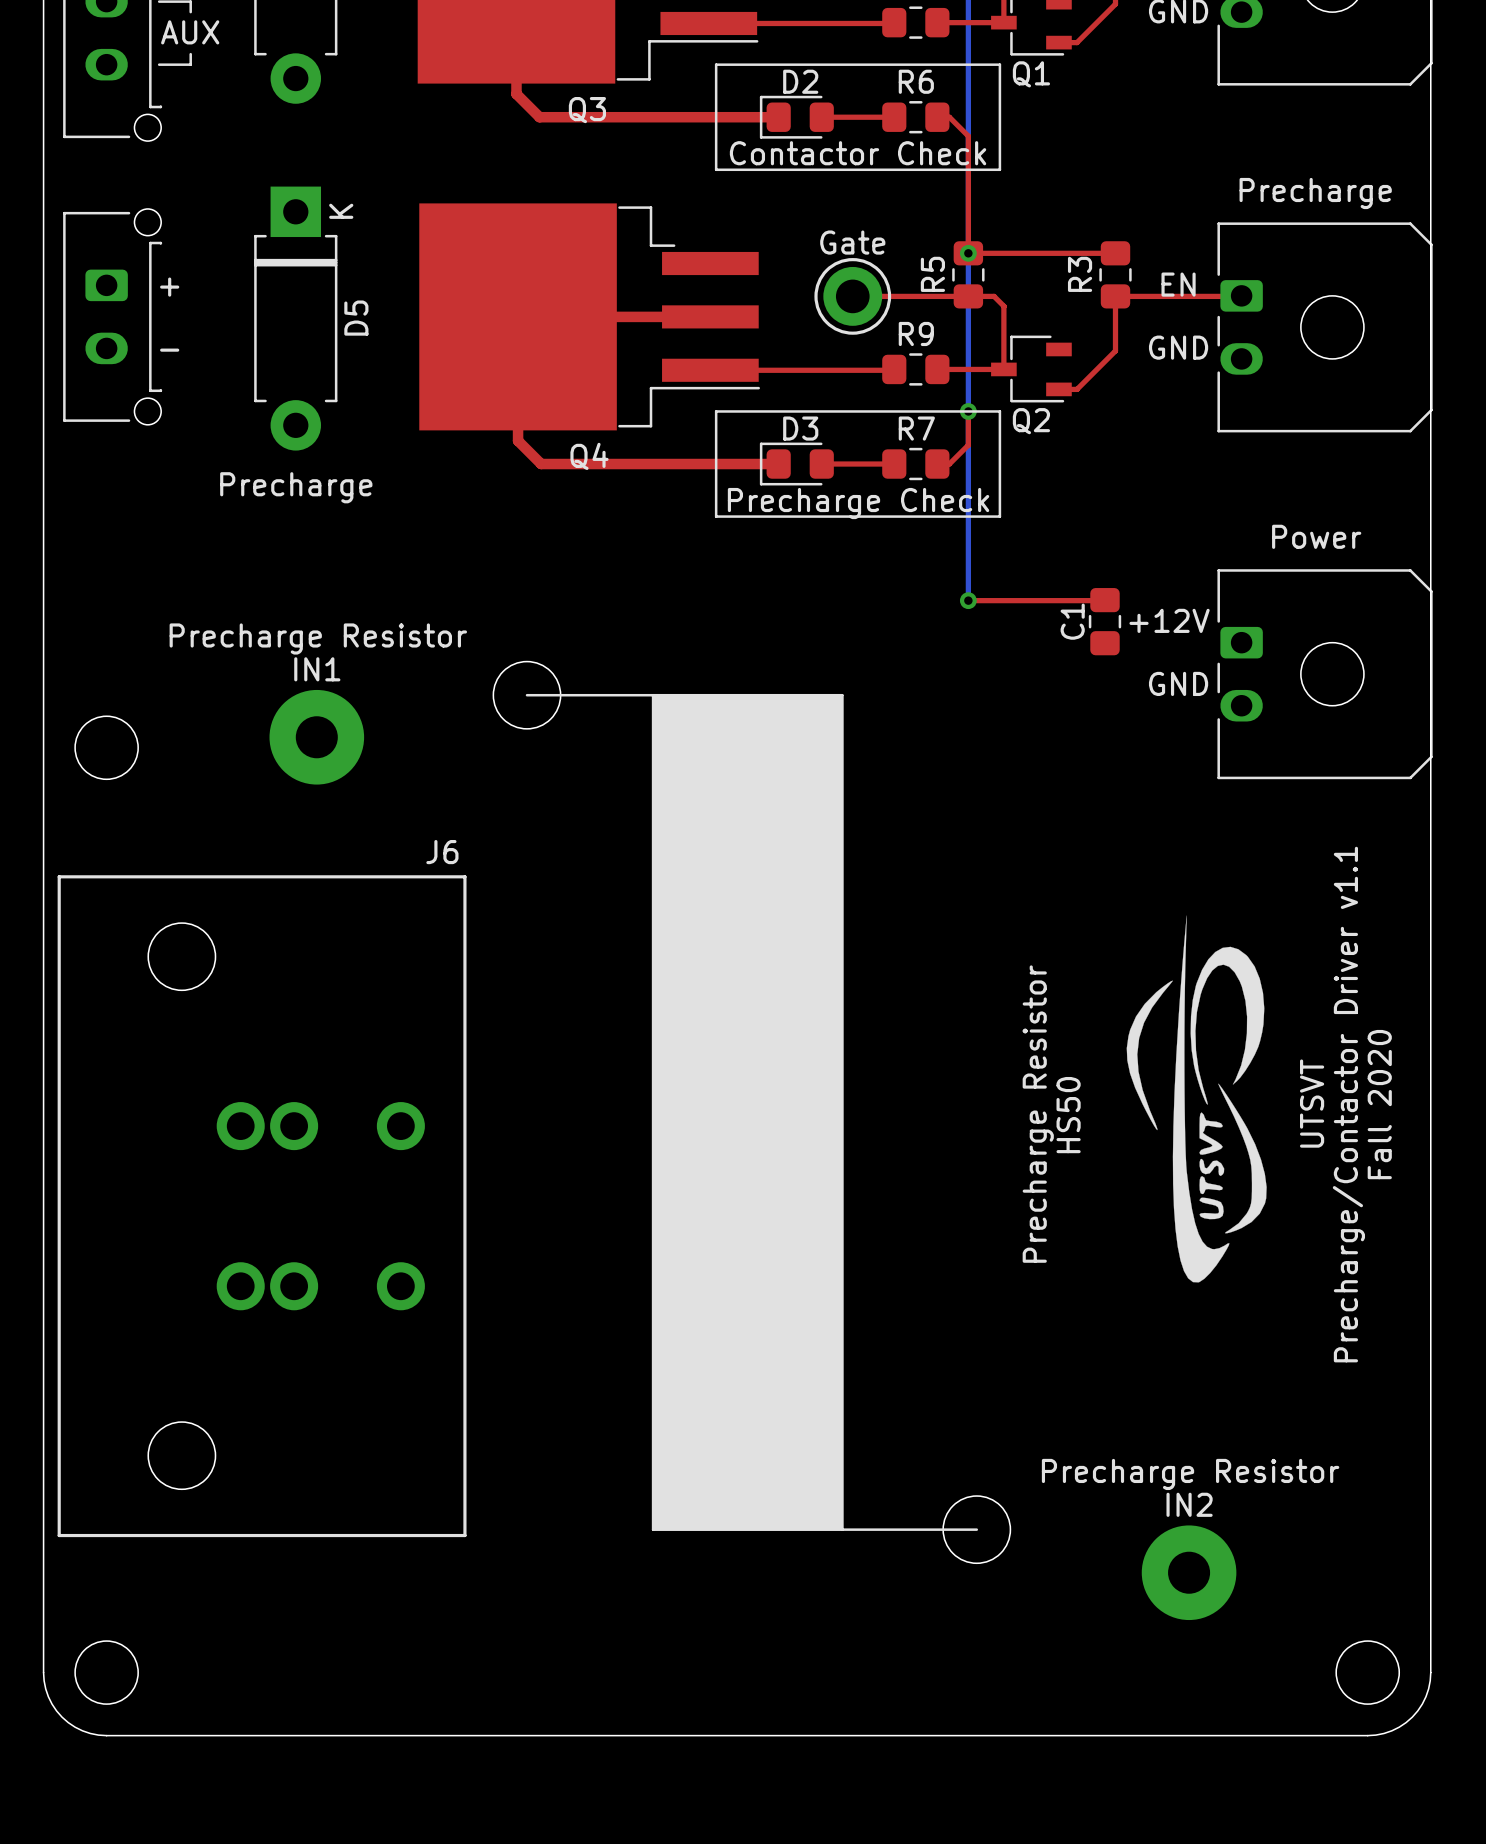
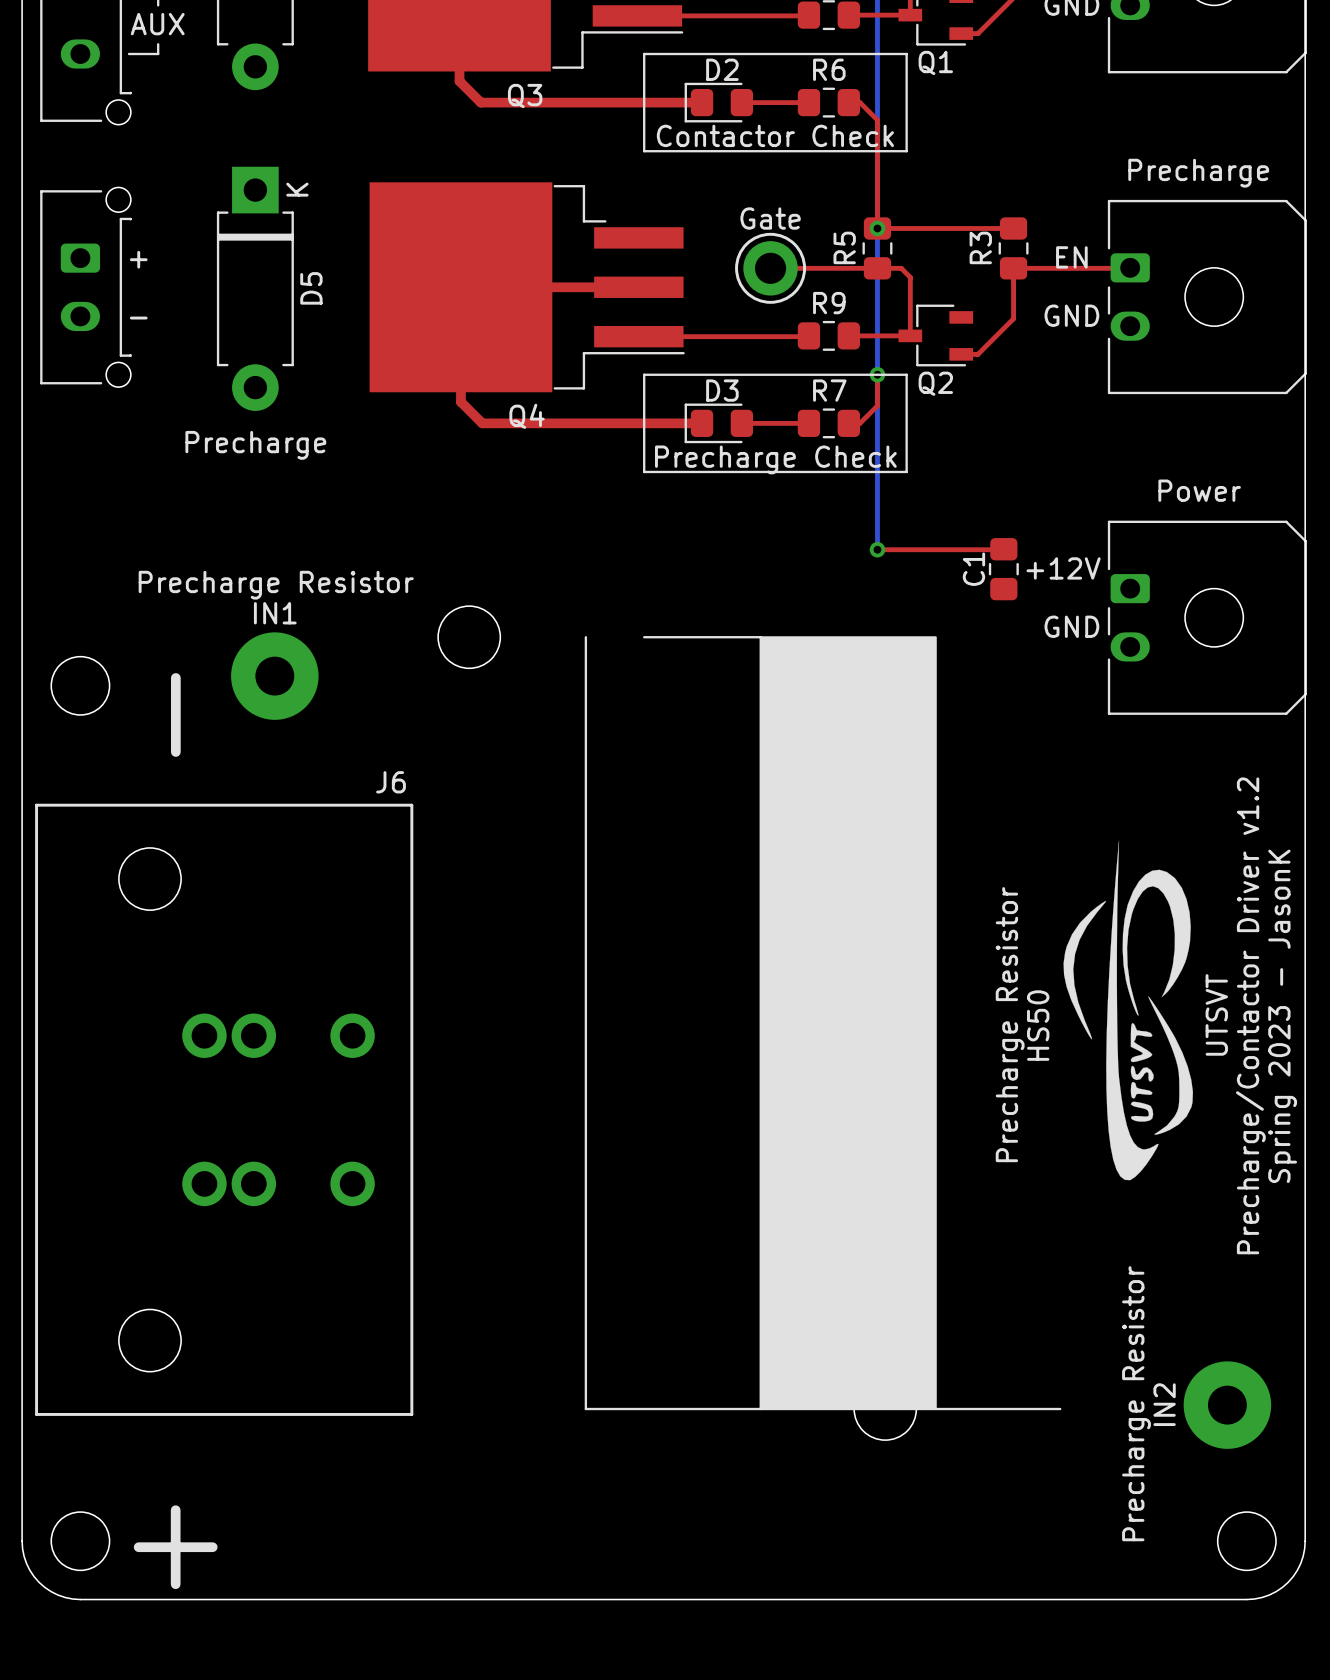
line: (526, 695) (716, 695) -> none
text: none -> - (175, 714)
drawing position: (1196, 1098) -> (1128, 1010)
text position: UTSVT (1312, 1103) -> UTSVT (1216, 1014)
text: Precharge/Contactor Driver v1.1 (1348, 1104) -> none
text: Fall 2020 (1379, 1104) -> Precharge/Contactor Driver v1.2 (1250, 1015)
text: none -> Spring 2023 - JasonK (1282, 1016)
drawing position: (747, 1112) -> (848, 1023)
text position: Precharge Resistor (1038, 1114) -> Precharge Resistor (1010, 1024)
text position: HS50 (1068, 1115) -> HS50 (1038, 1025)
text rotation: 0° (1190, 1474) -> 90° counterclockwise (1136, 1403)
text rotation: 0° (1189, 1504) -> 90° counterclockwise (1164, 1404)
text position: IN2 (1189, 1504) -> IN2 (1164, 1404)
line: none -> (885, 1409) (1060, 1409)
part position: (1189, 1572) -> (1227, 1405)
text: none -> + (175, 1547)

